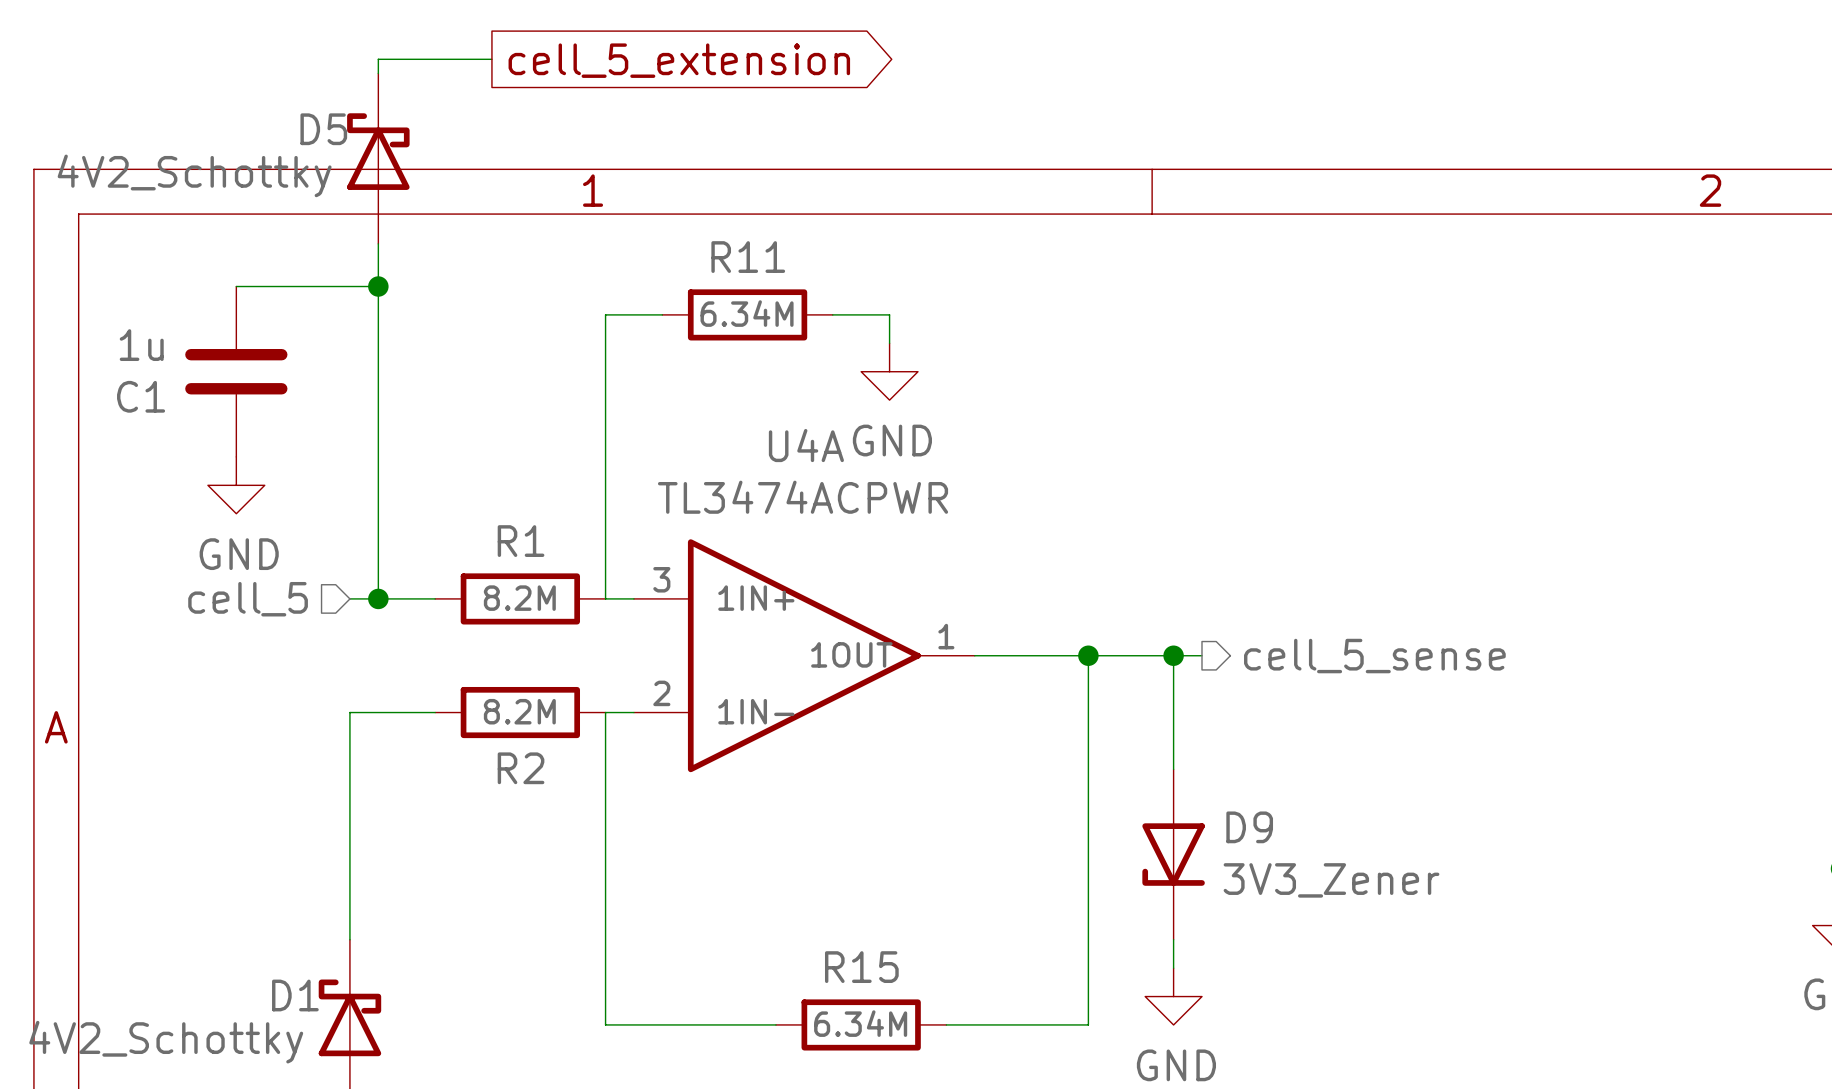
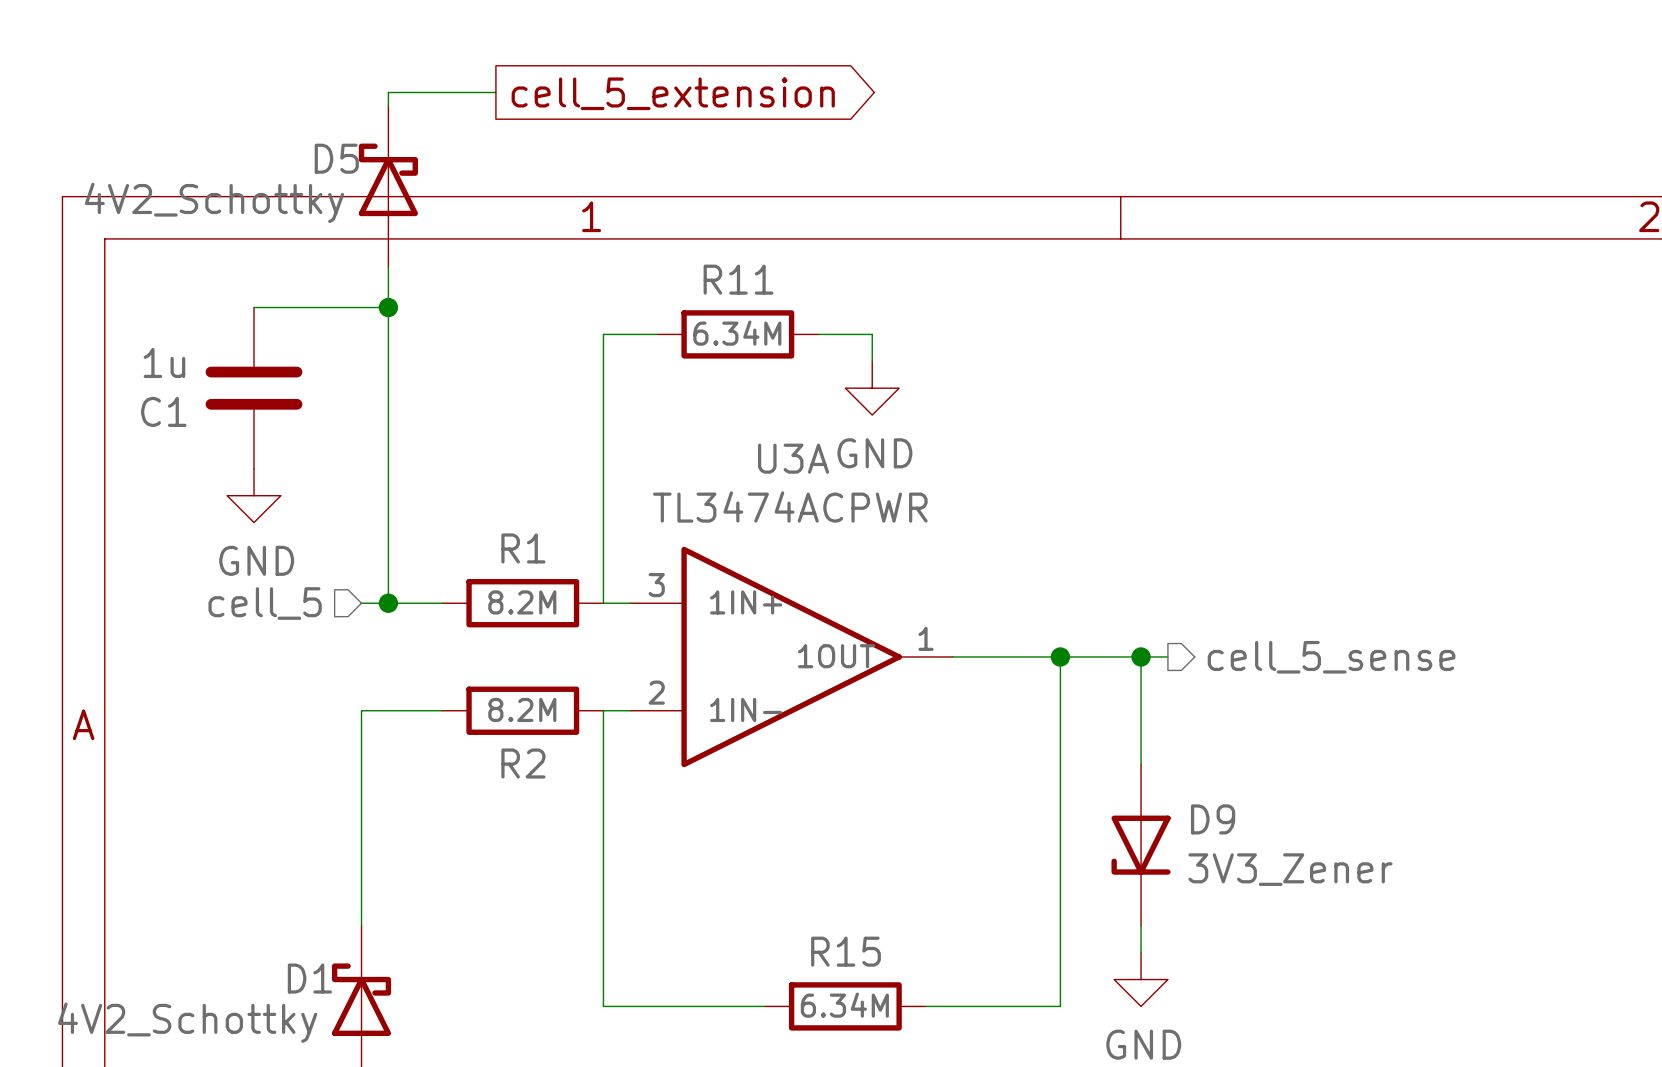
U4A name: U4A (806, 445) -> U3A (793, 458)

